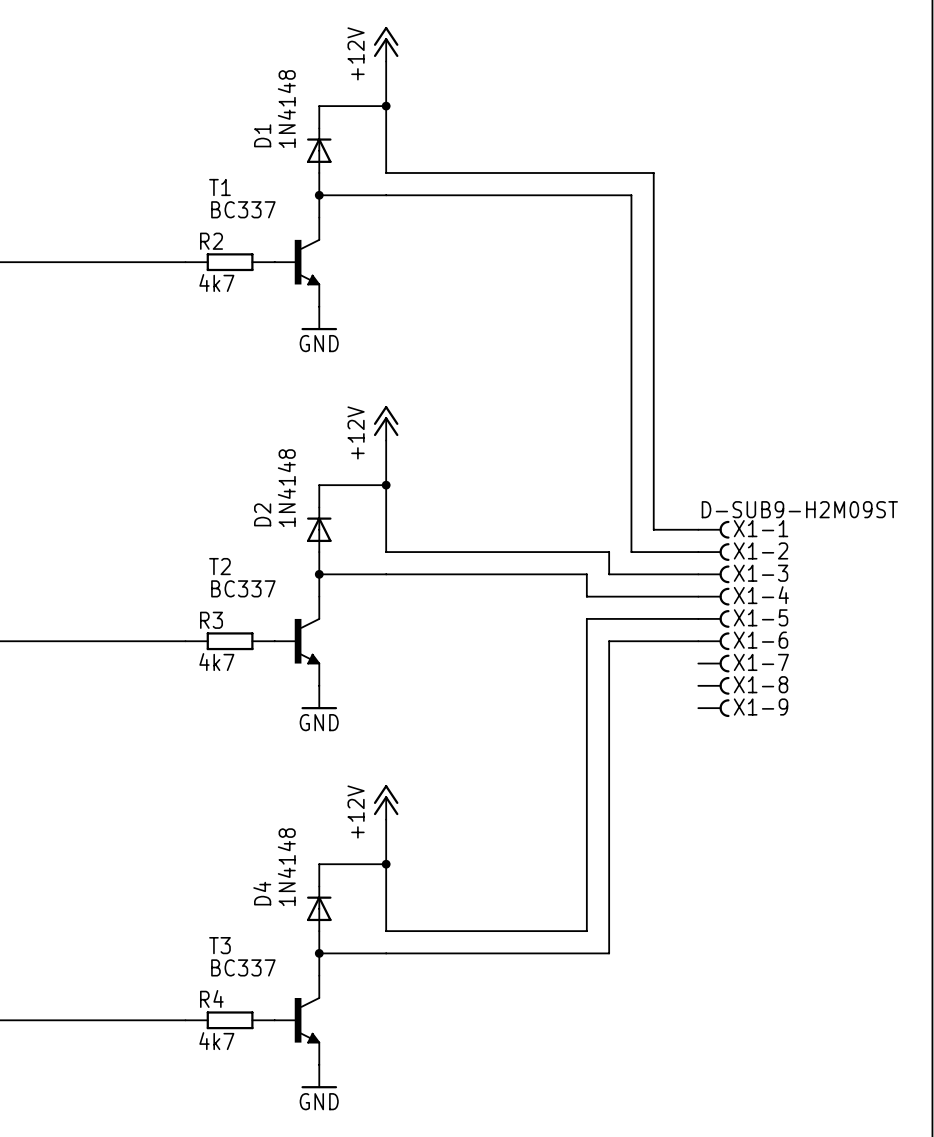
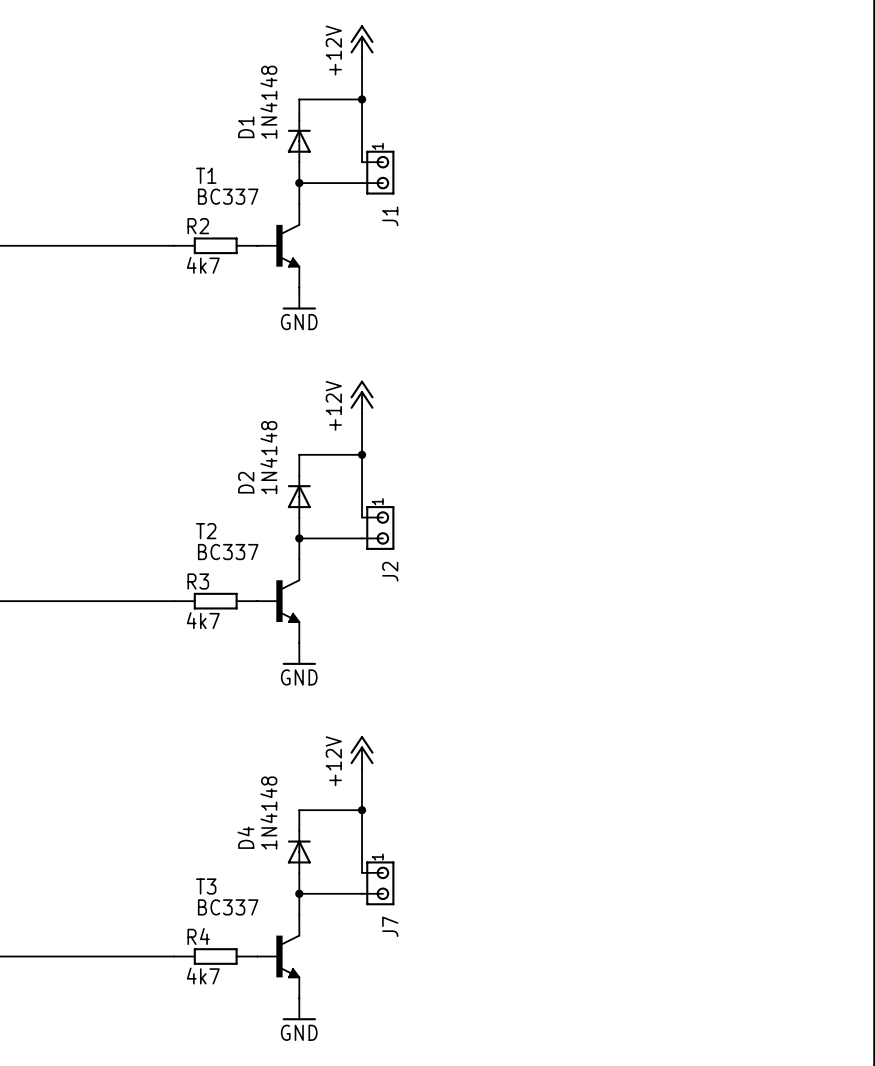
wire: (386, 172) (653, 172) (653, 529) (698, 529) -> none
J1: none -> (378, 172)
wire: (386, 195) (631, 195) (631, 552) (698, 552) -> none
X1-1: D-SUB9-H2M09ST (713, 529) -> none
wire: (386, 552) (609, 552) (609, 574) (698, 574) -> none
X1-2: (713, 552) -> none
J2: none -> (378, 527)
wire: (386, 574) (586, 574) (586, 596) (698, 596) -> none
X1-3: (713, 574) -> none
X1-4: (713, 596) -> none
wire: (698, 618) (586, 618) (586, 931) (386, 931) -> none
X1-5: (713, 618) -> none
wire: (698, 641) (609, 641) (609, 953) (386, 953) -> none
X1-6: (713, 641) -> none
X1-7: (713, 663) -> none
X1-8: (713, 685) -> none
X1-9: (713, 708) -> none
J7: none -> (378, 883)

